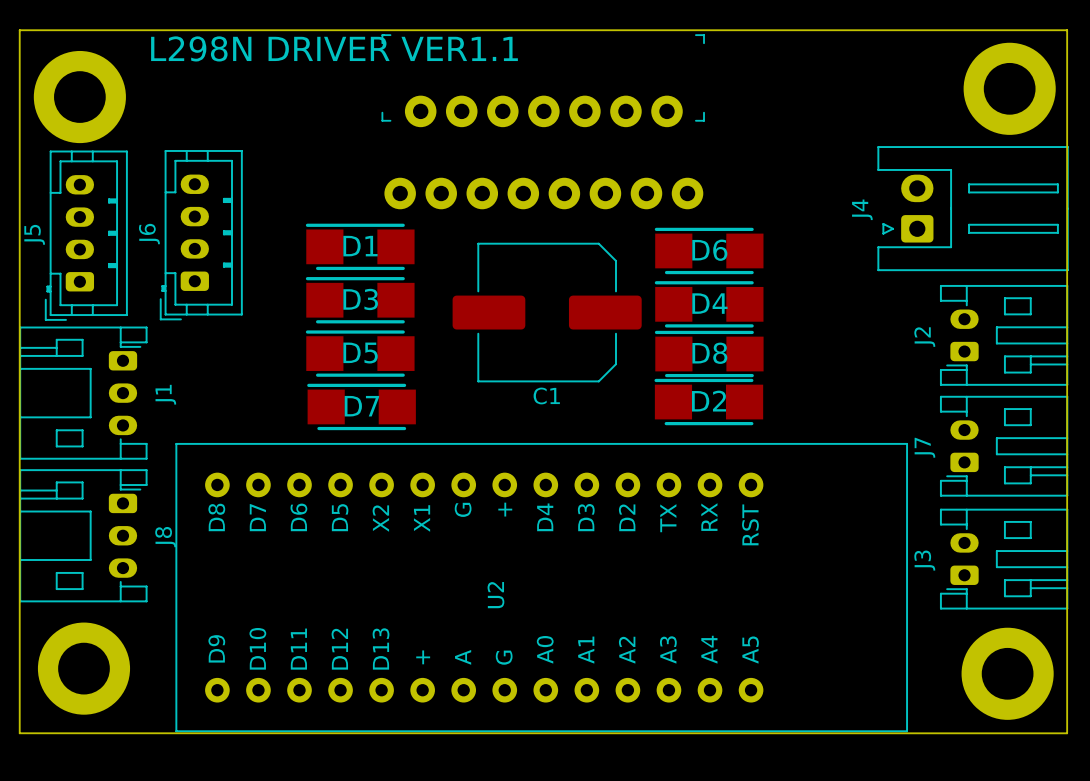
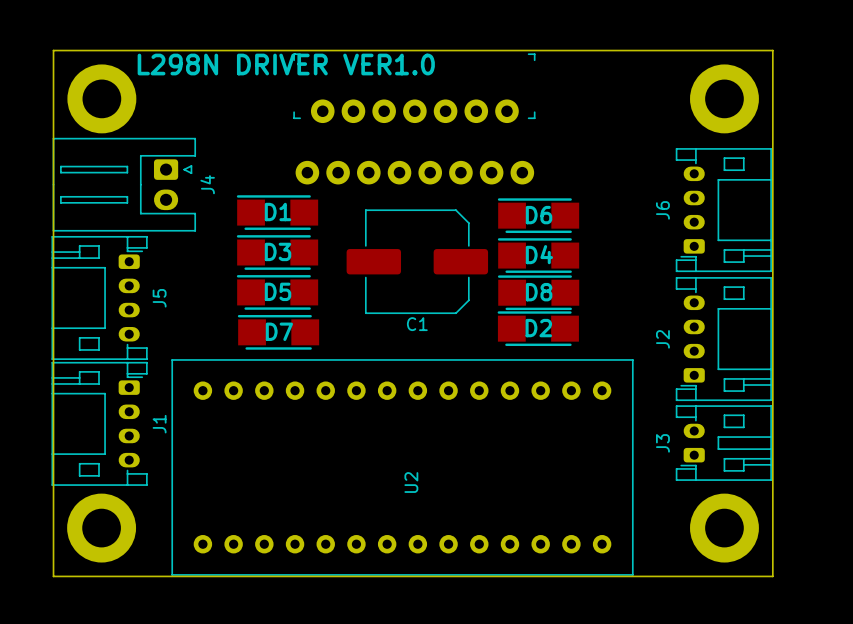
board edge: (60, 30) (19, 30) (19, 733) (1067, 733) (1067, 30) (1022, 30) -> (53, 50) (53, 576) (772, 576) (772, 50)
text: L298N DRIVER VER1.1 (334, 48) -> L298N DRIVER VER1.0 (286, 64)
part position: (1009, 88) -> (724, 98)
part position: (79, 97) -> (101, 98)
J5 footprint: [44, 150, 128, 321] -> [51, 236, 148, 360]
J6 footprint: [159, 150, 243, 321] -> [675, 148, 772, 272]
J4 rotation: 0° (973, 208) -> 180° (124, 184)
J4 position: (973, 208) -> (124, 184)
J5 name position: J5 (34, 234) -> J5 (159, 298)
J2 footprint: [939, 284, 1069, 386] -> [675, 277, 772, 401]
J1 footprint: [19, 326, 148, 460] -> [51, 361, 148, 486]
U2 footprint: [175, 442, 909, 733] -> [171, 359, 634, 576]
J7: (1004, 446) -> none
J8: (83, 535) -> none
J3 position: (1004, 559) -> (723, 443)
U2 name position: U2 (495, 595) -> U2 (411, 482)
part position: (83, 668) -> (101, 528)
part position: (1007, 673) -> (724, 528)

